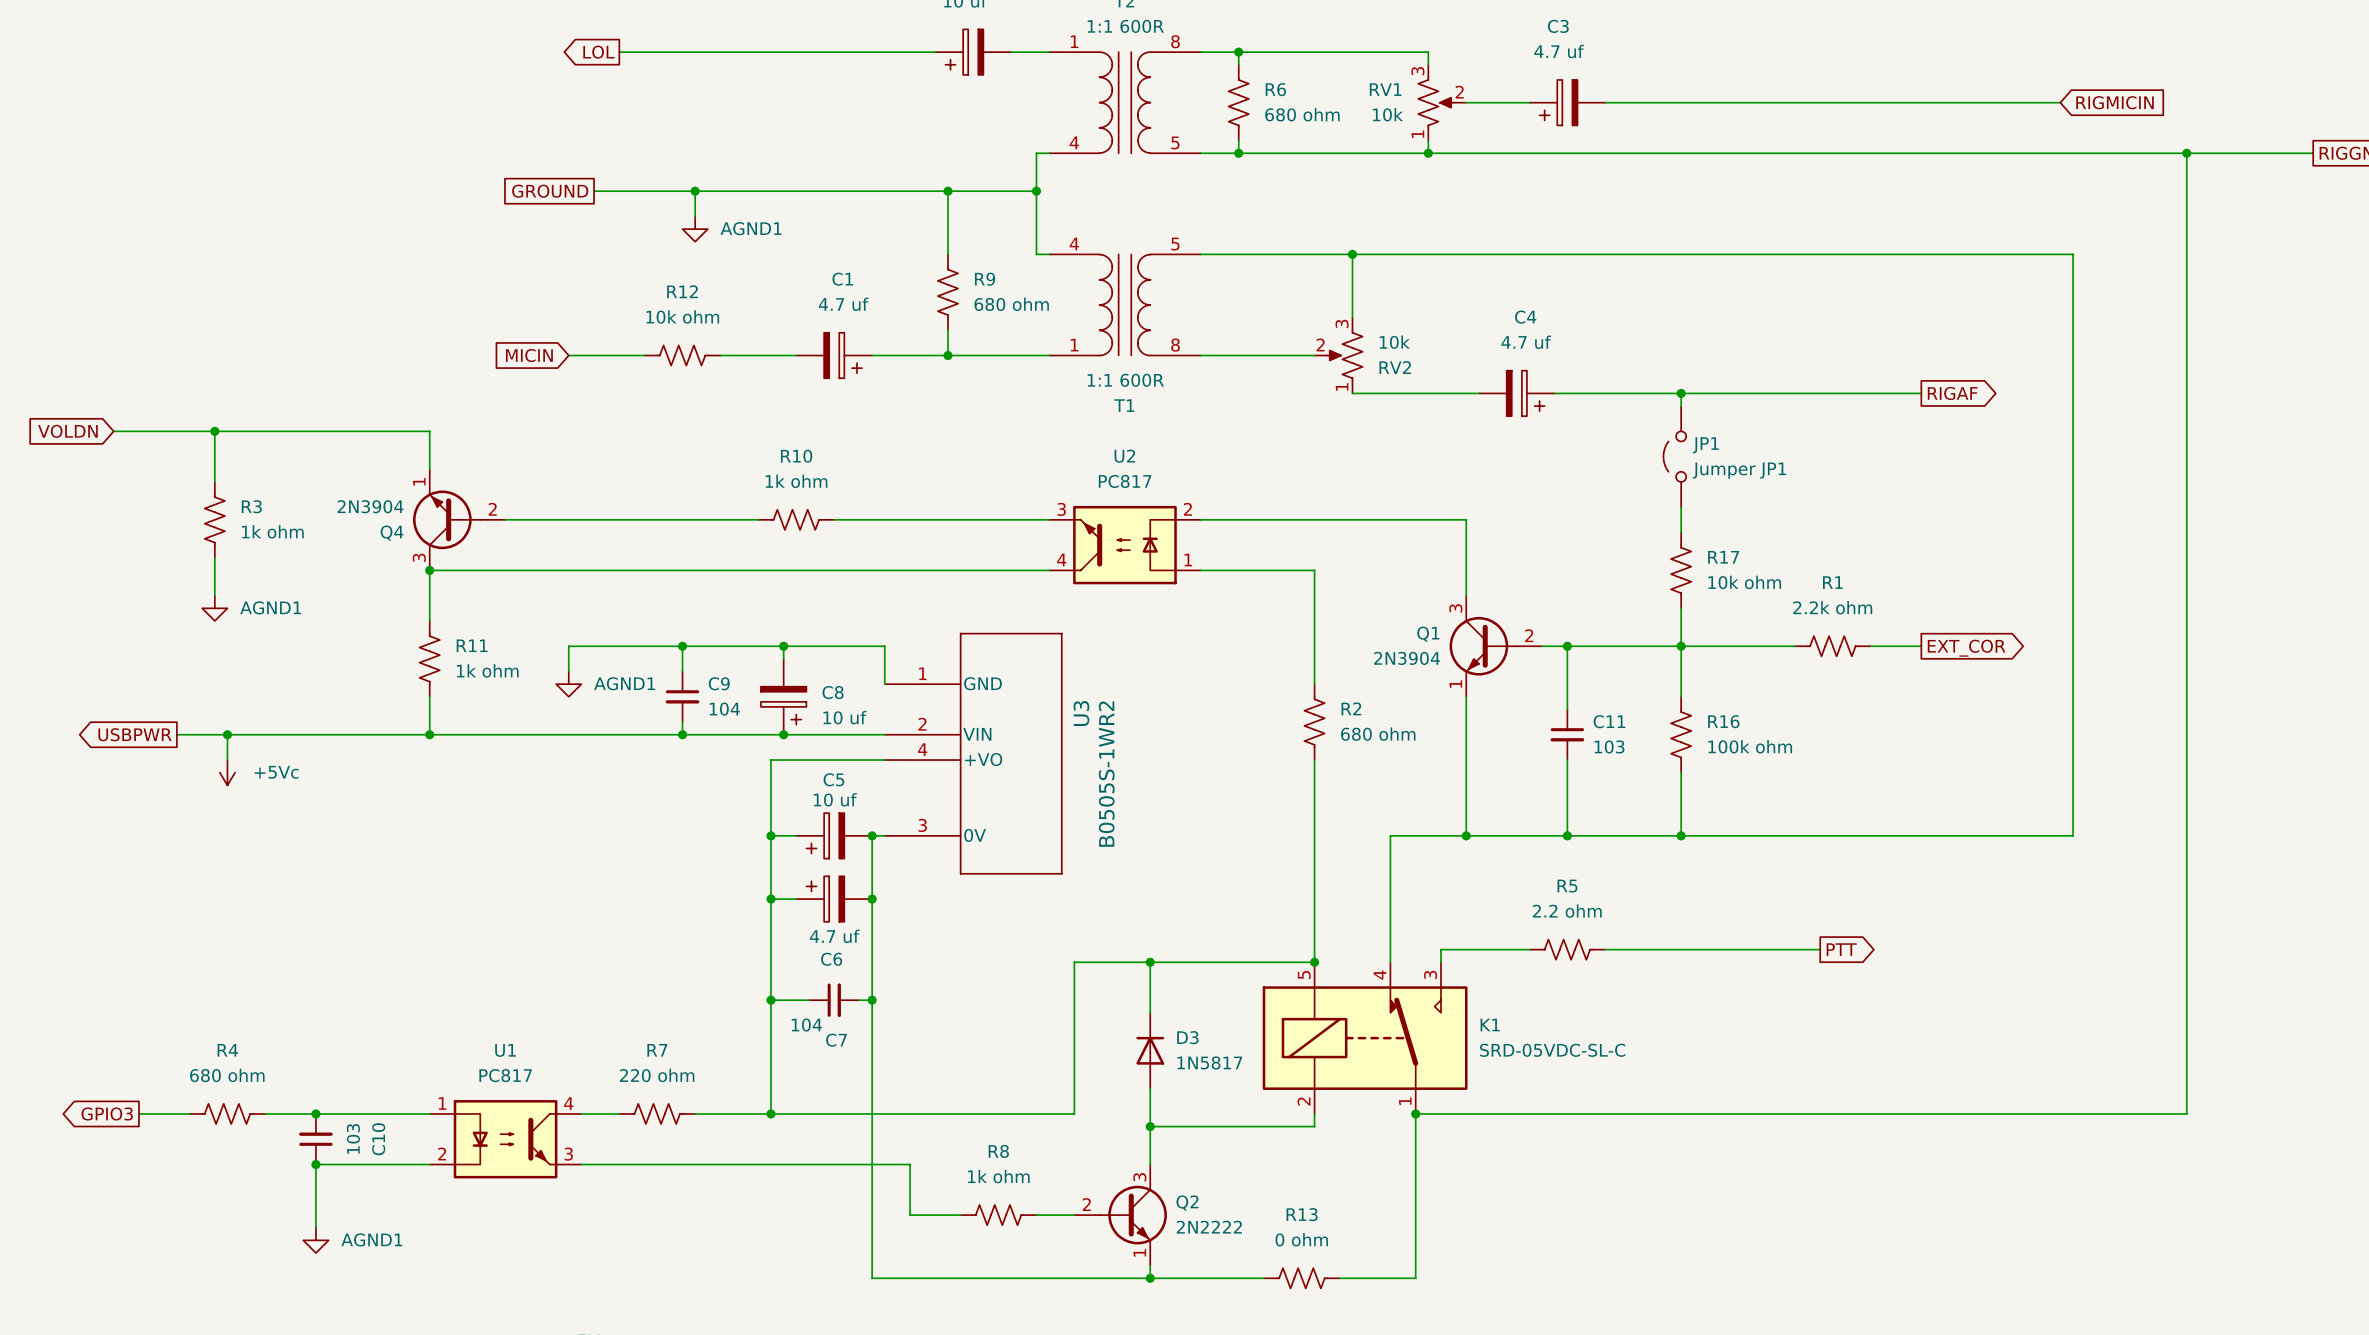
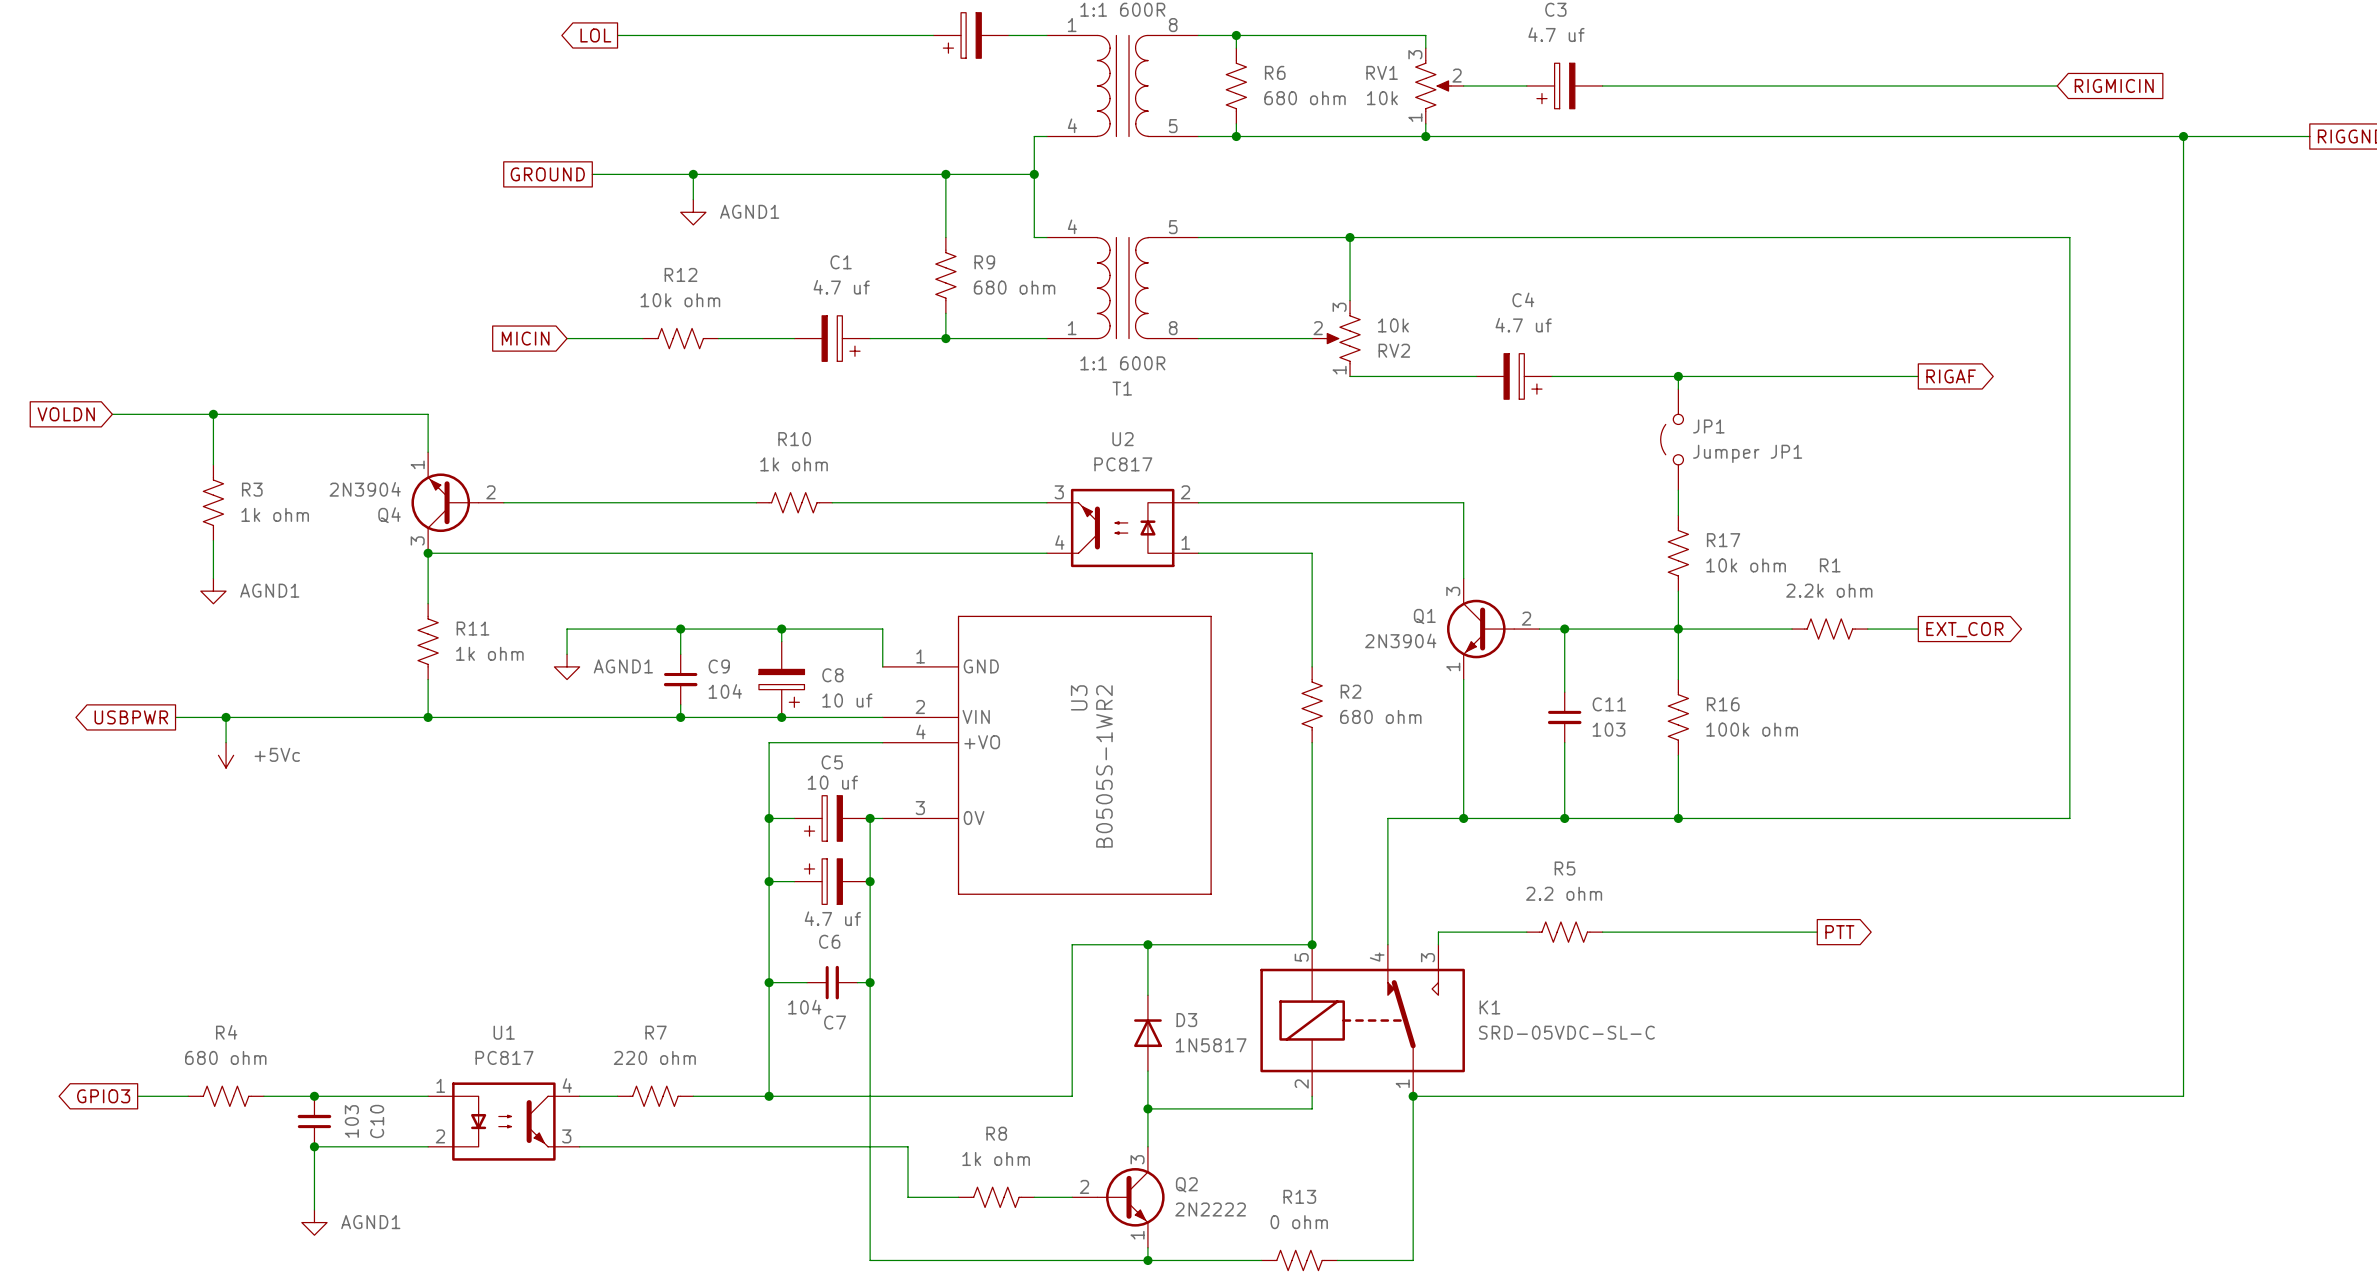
U3 symbol: [884, 632, 1063, 875] -> [882, 615, 1212, 895]

